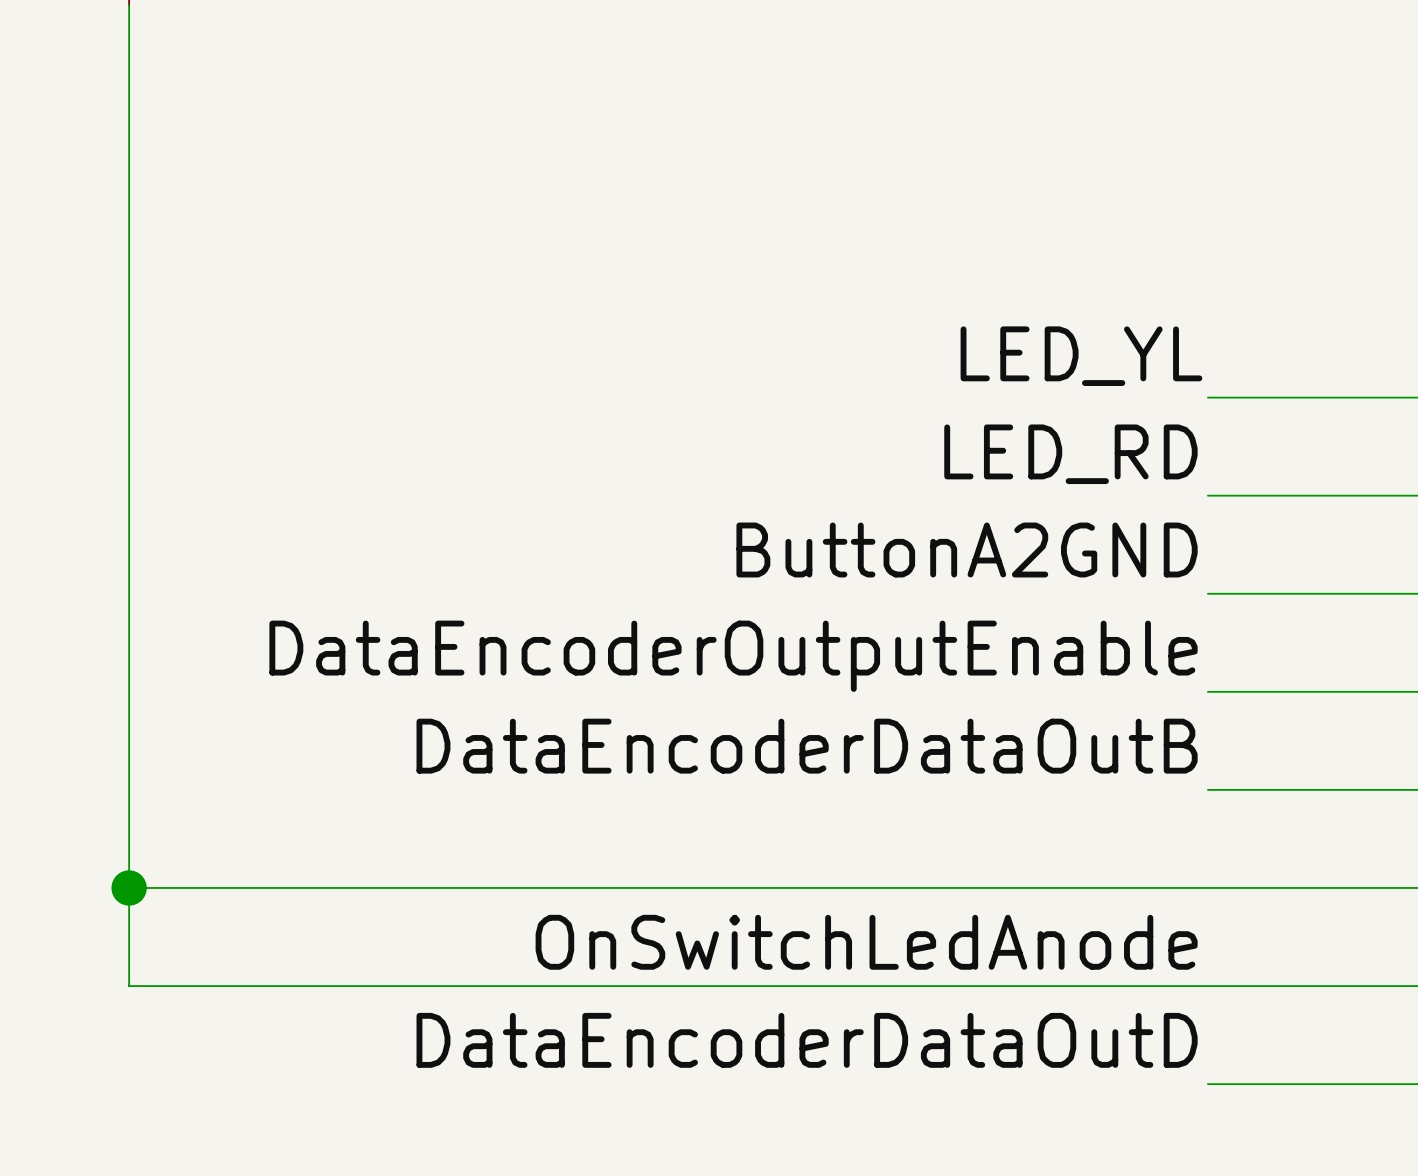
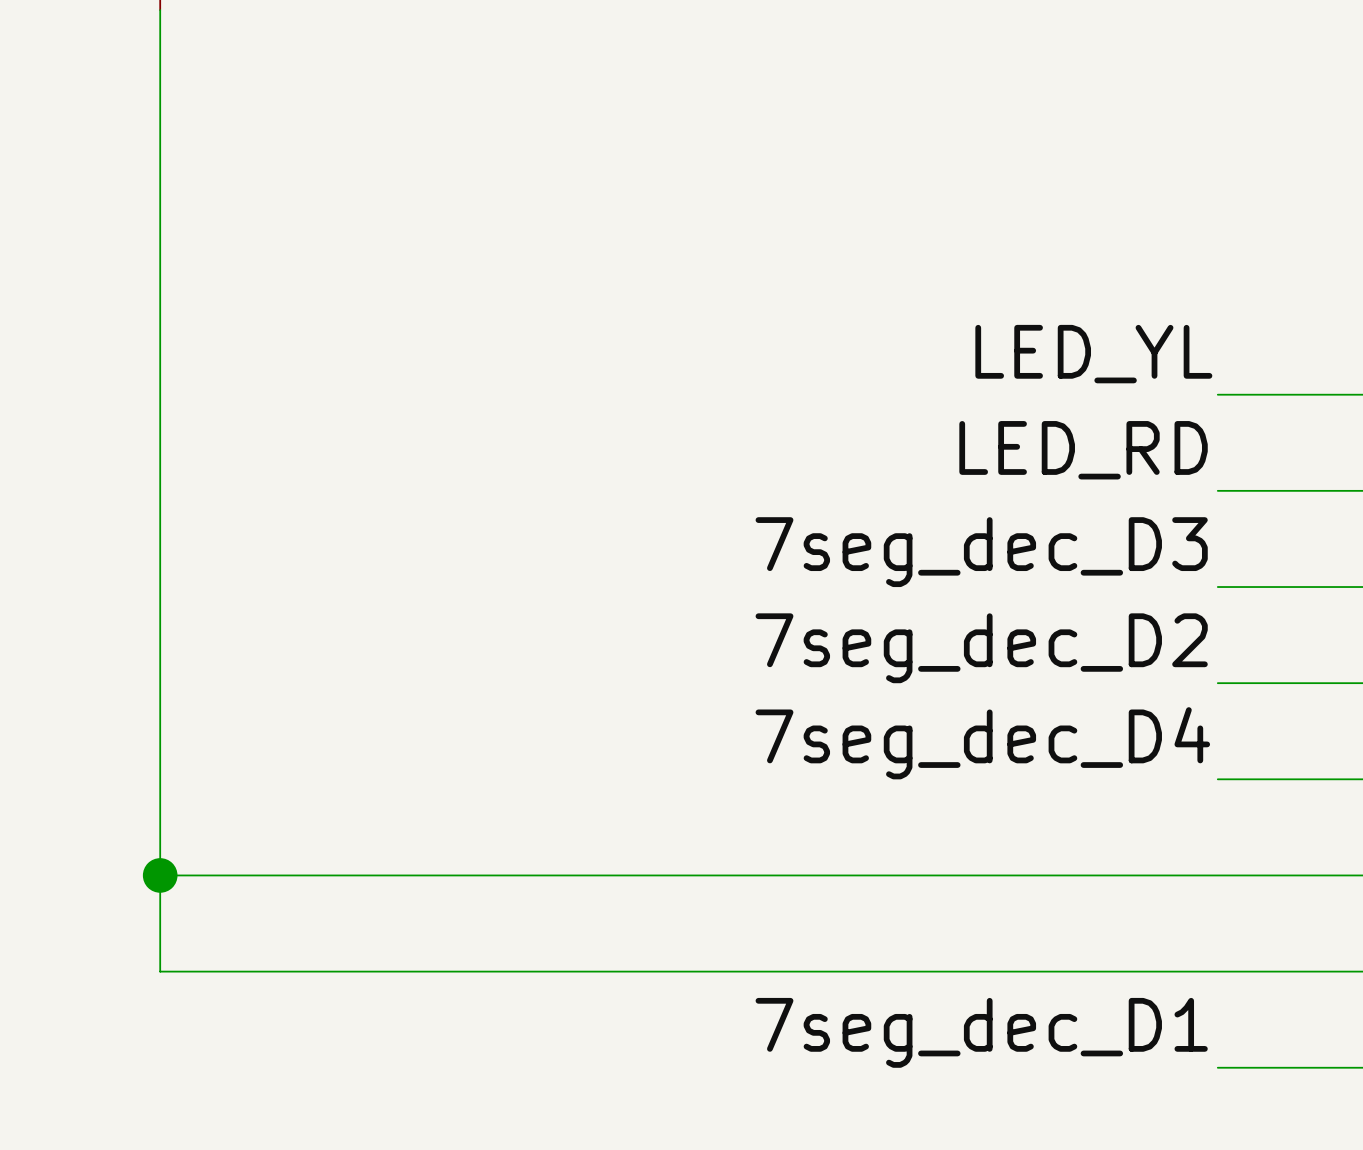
label: ButtonA2GND (967, 550) -> 7seg_dec_D3 (981, 552)
label: DataEncoderOutputEnable (733, 656) -> 7seg_dec_D2 (981, 648)
label: DataEncoderDataOutB (807, 746) -> 7seg_dec_D4 (982, 743)
label: OnSwitchLedAnode (866, 942) -> none
label: DataEncoderDataOutD (807, 1040) -> 7seg_dec_D1 (981, 1032)

